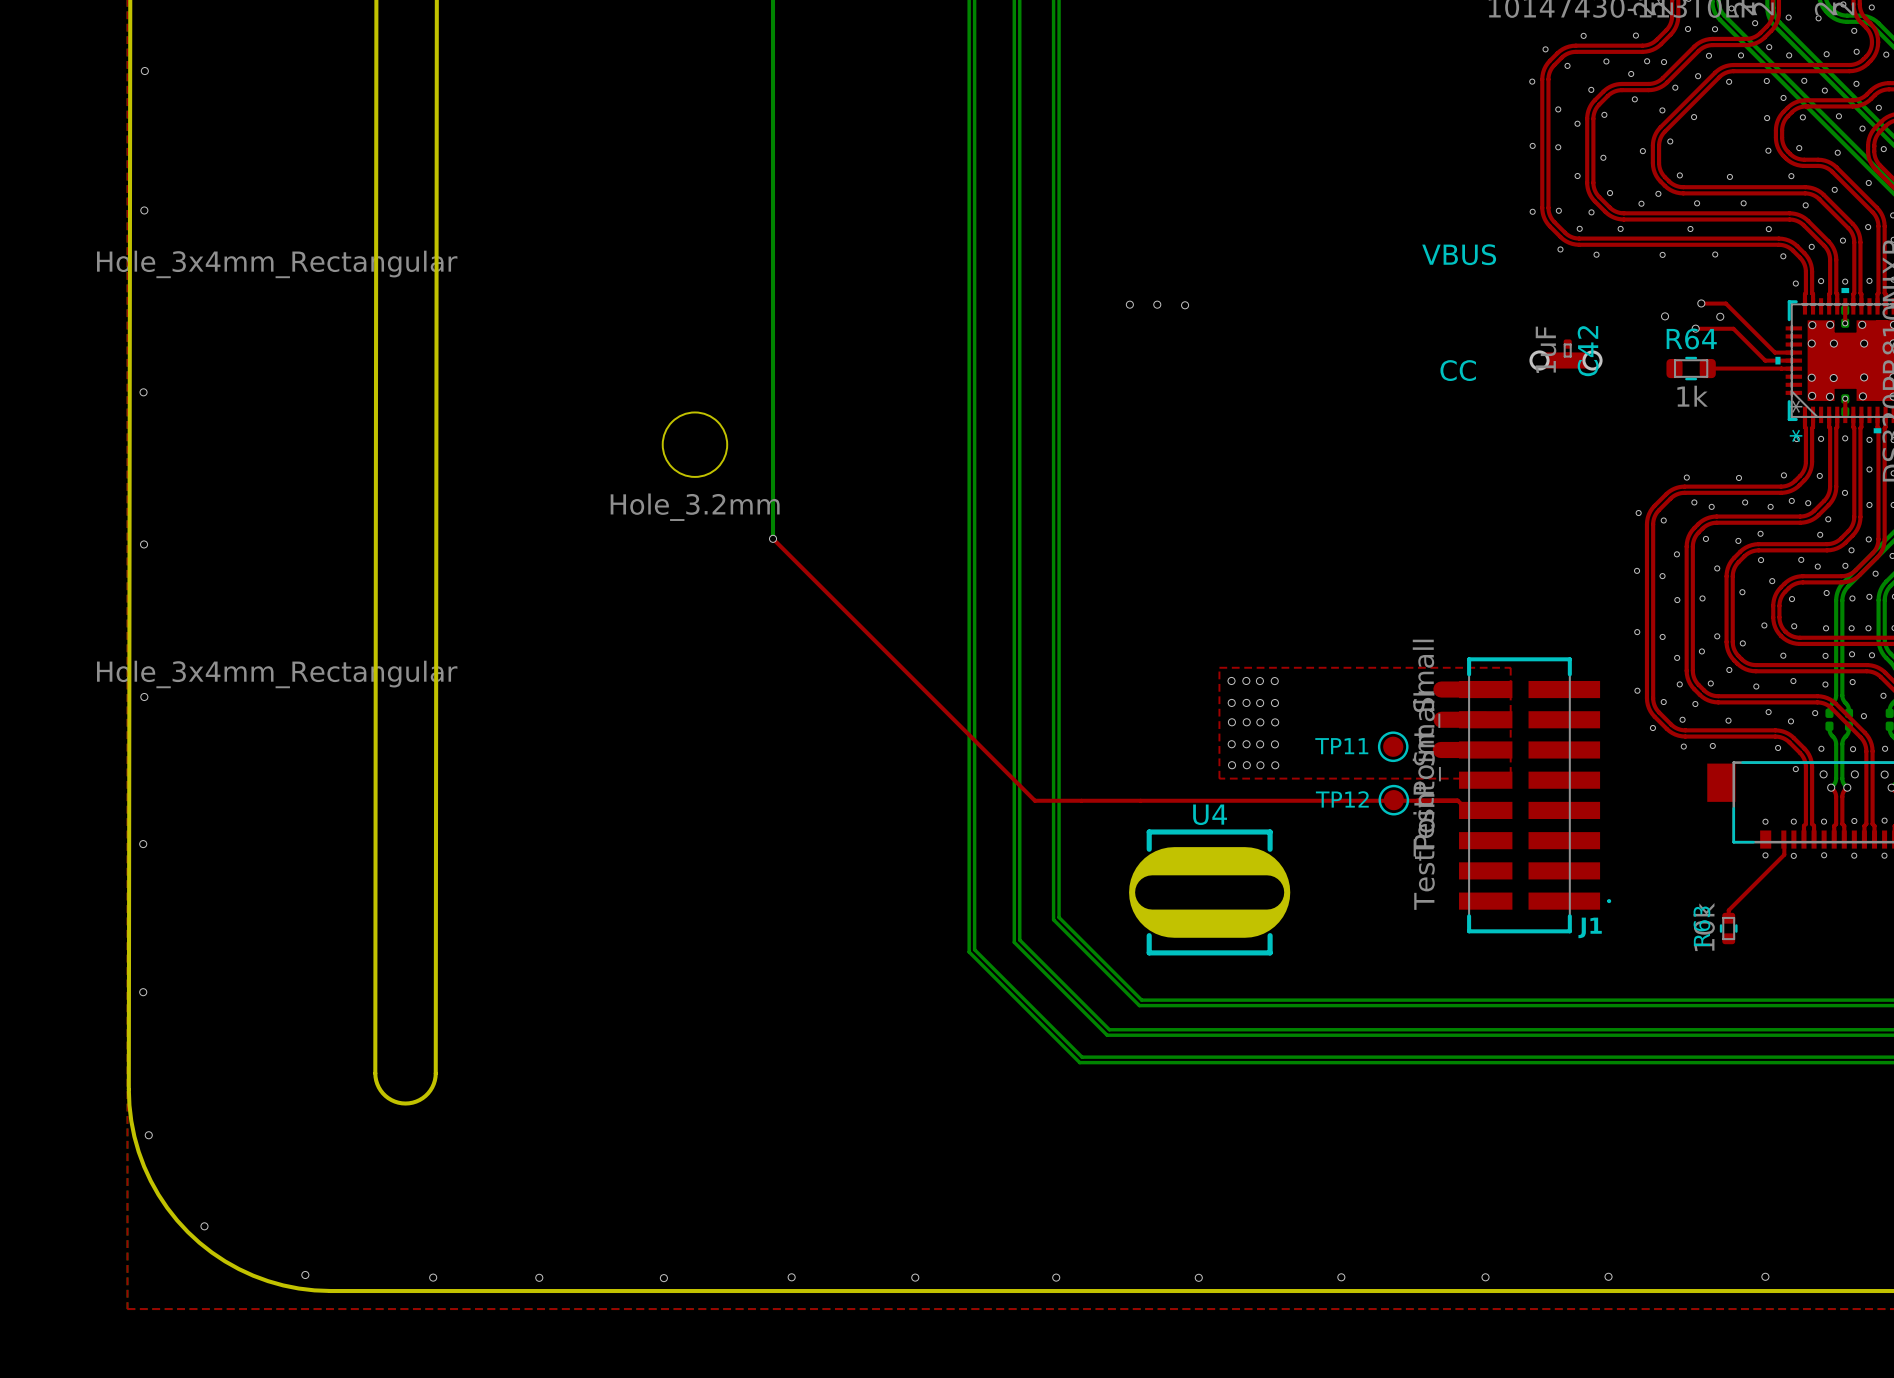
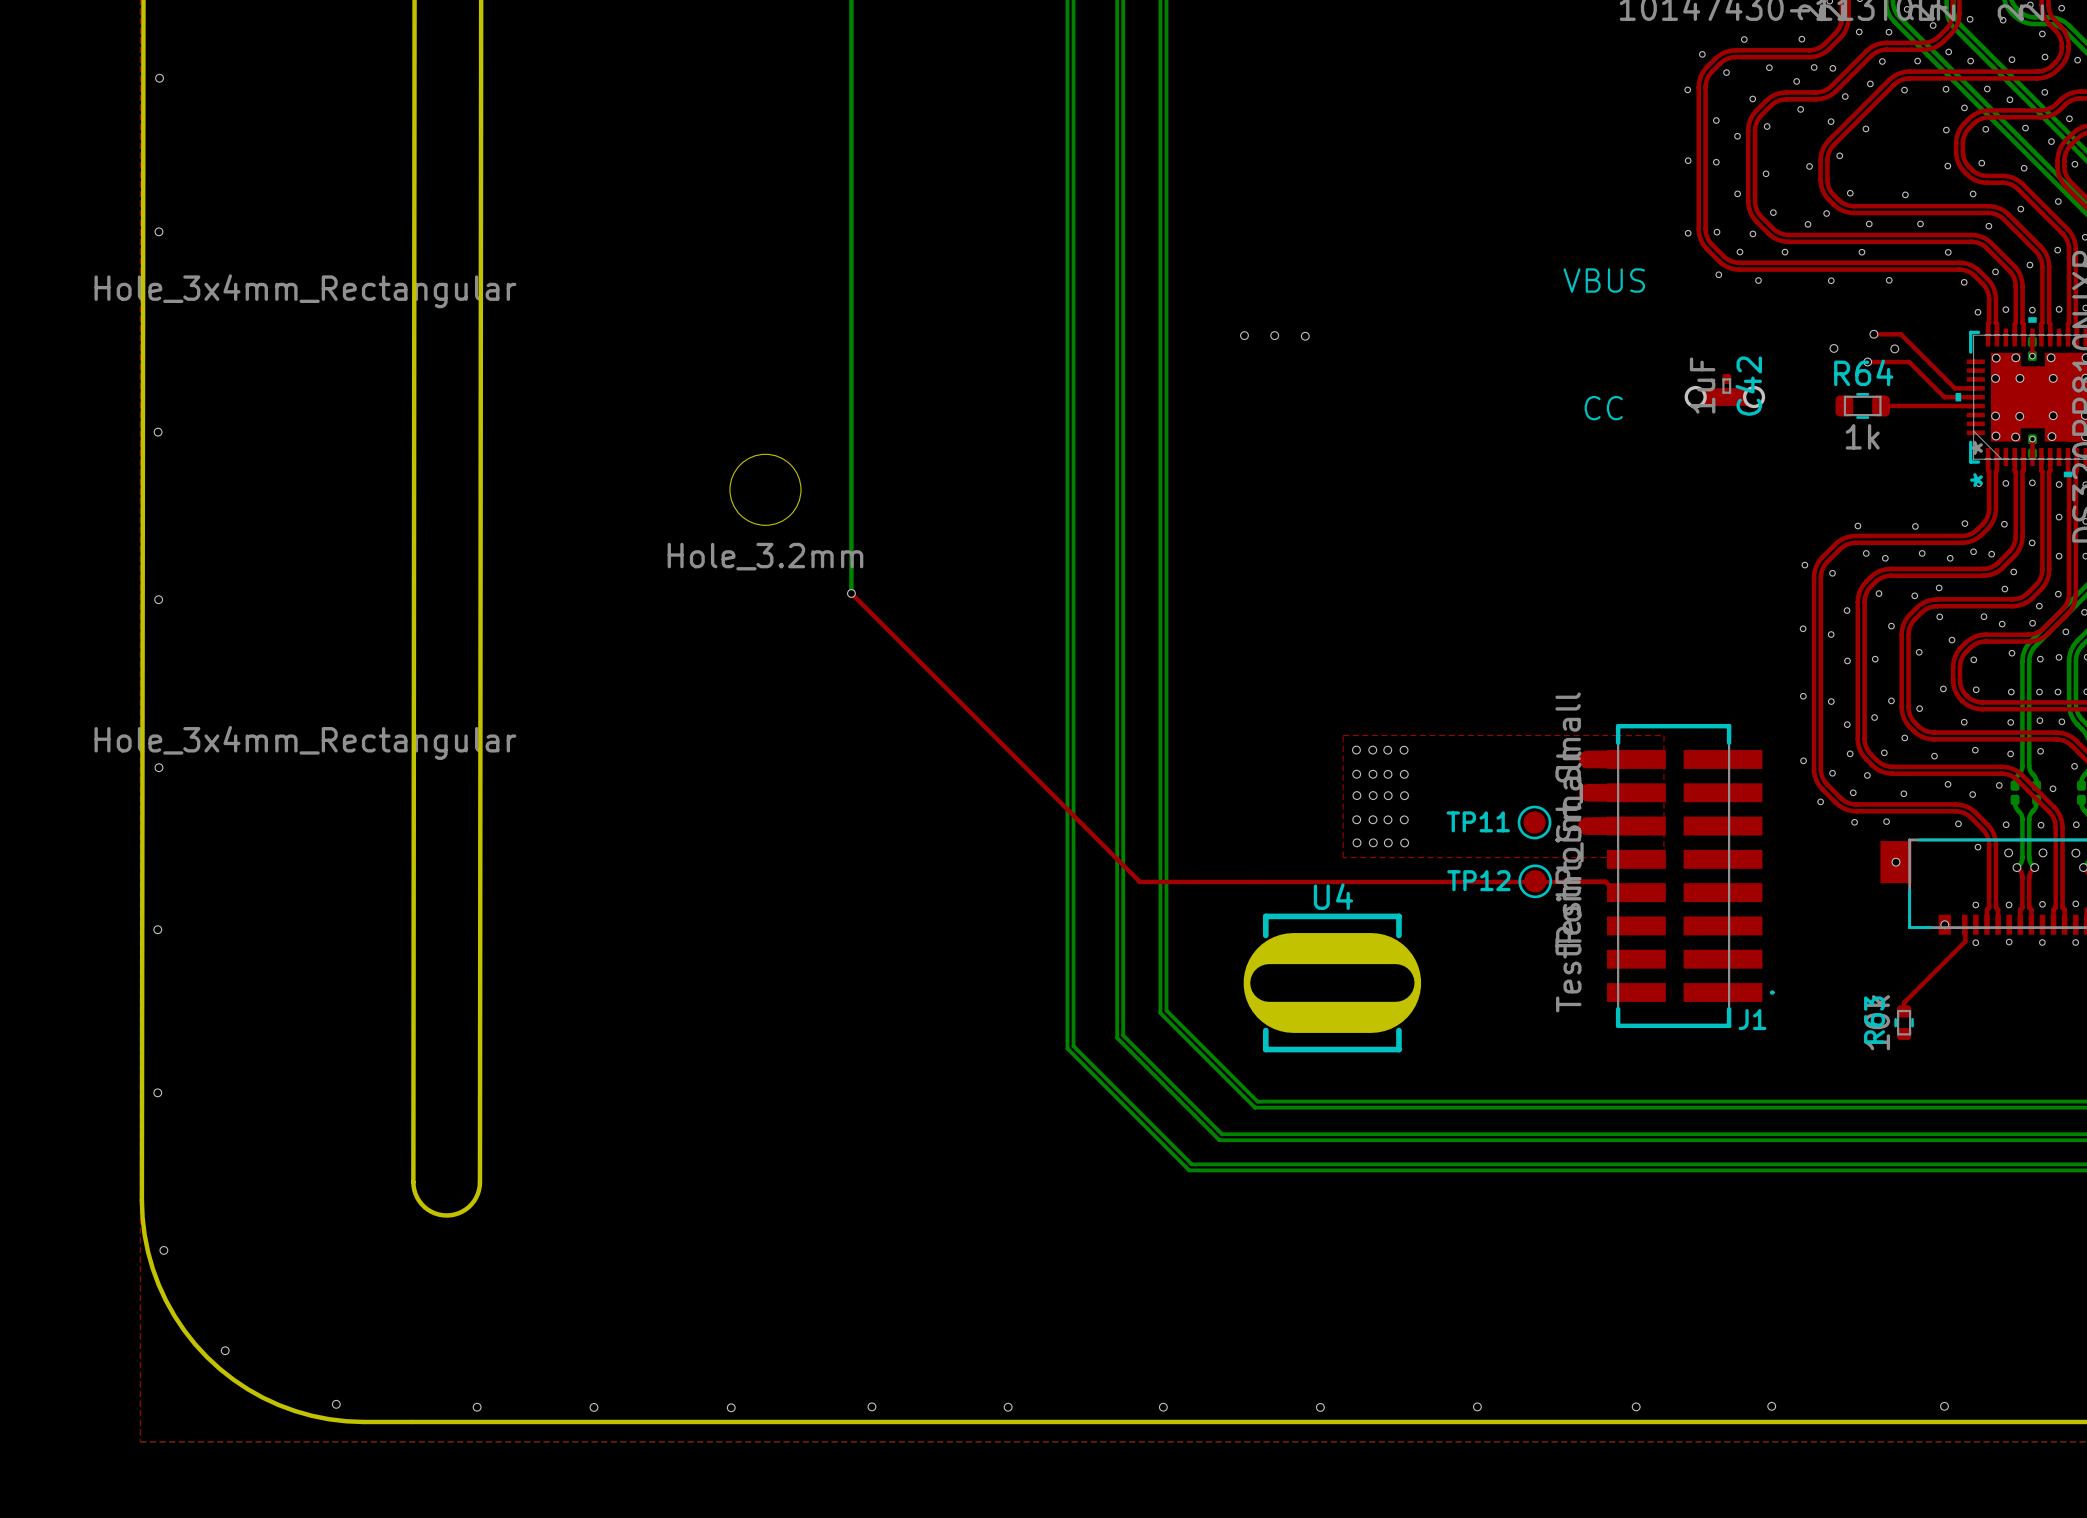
via: none -> (1895, 862)
via: (1765, 821) -> none
via: none -> (1944, 924)
via: (1765, 855) -> none

